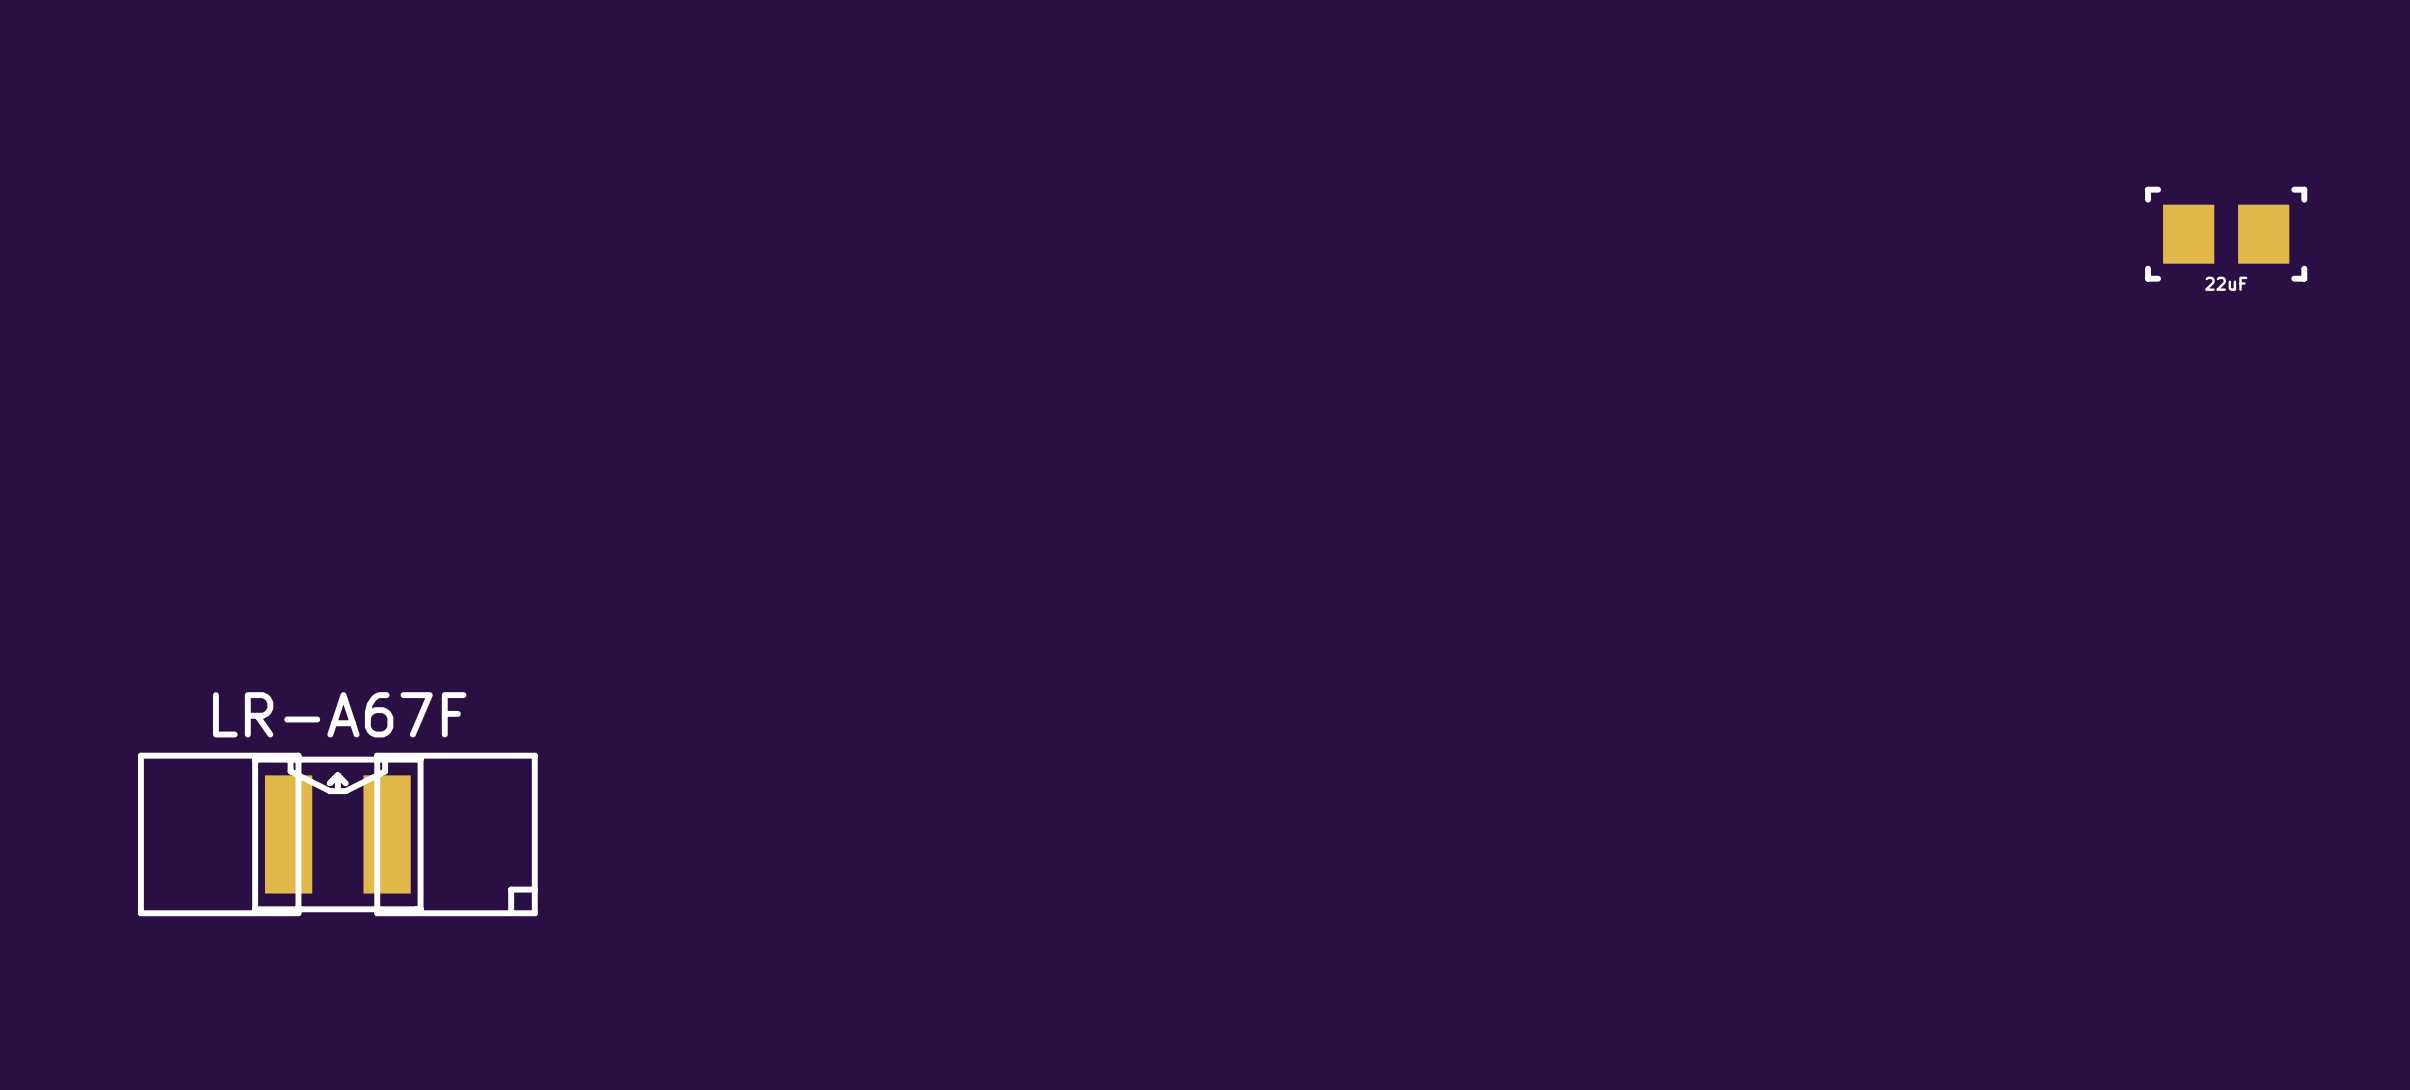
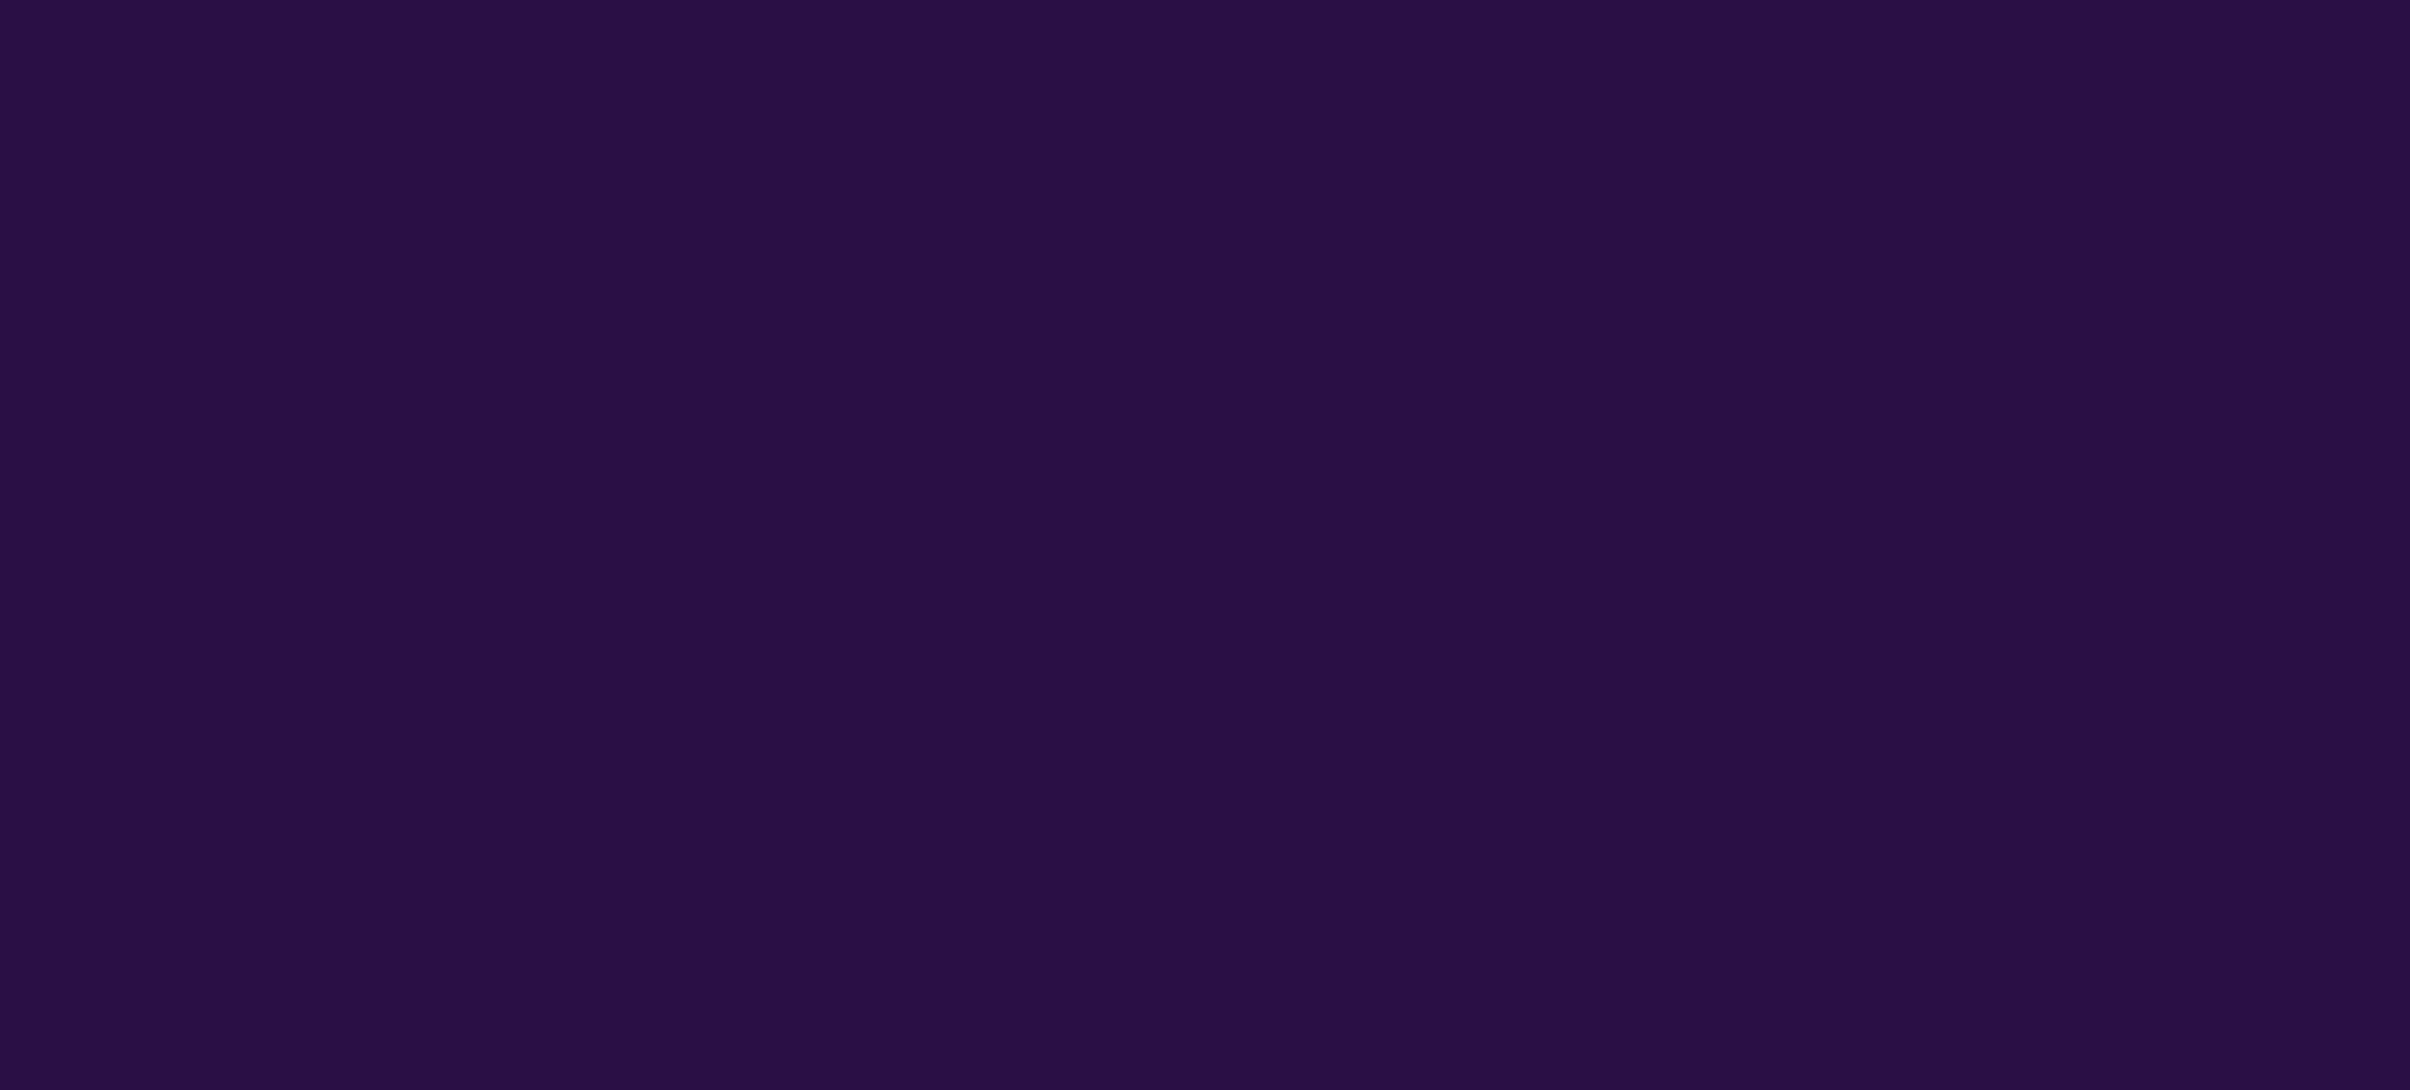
part: 22uF (2226, 234) -> none
part: LR-A67F (337, 834) -> none

